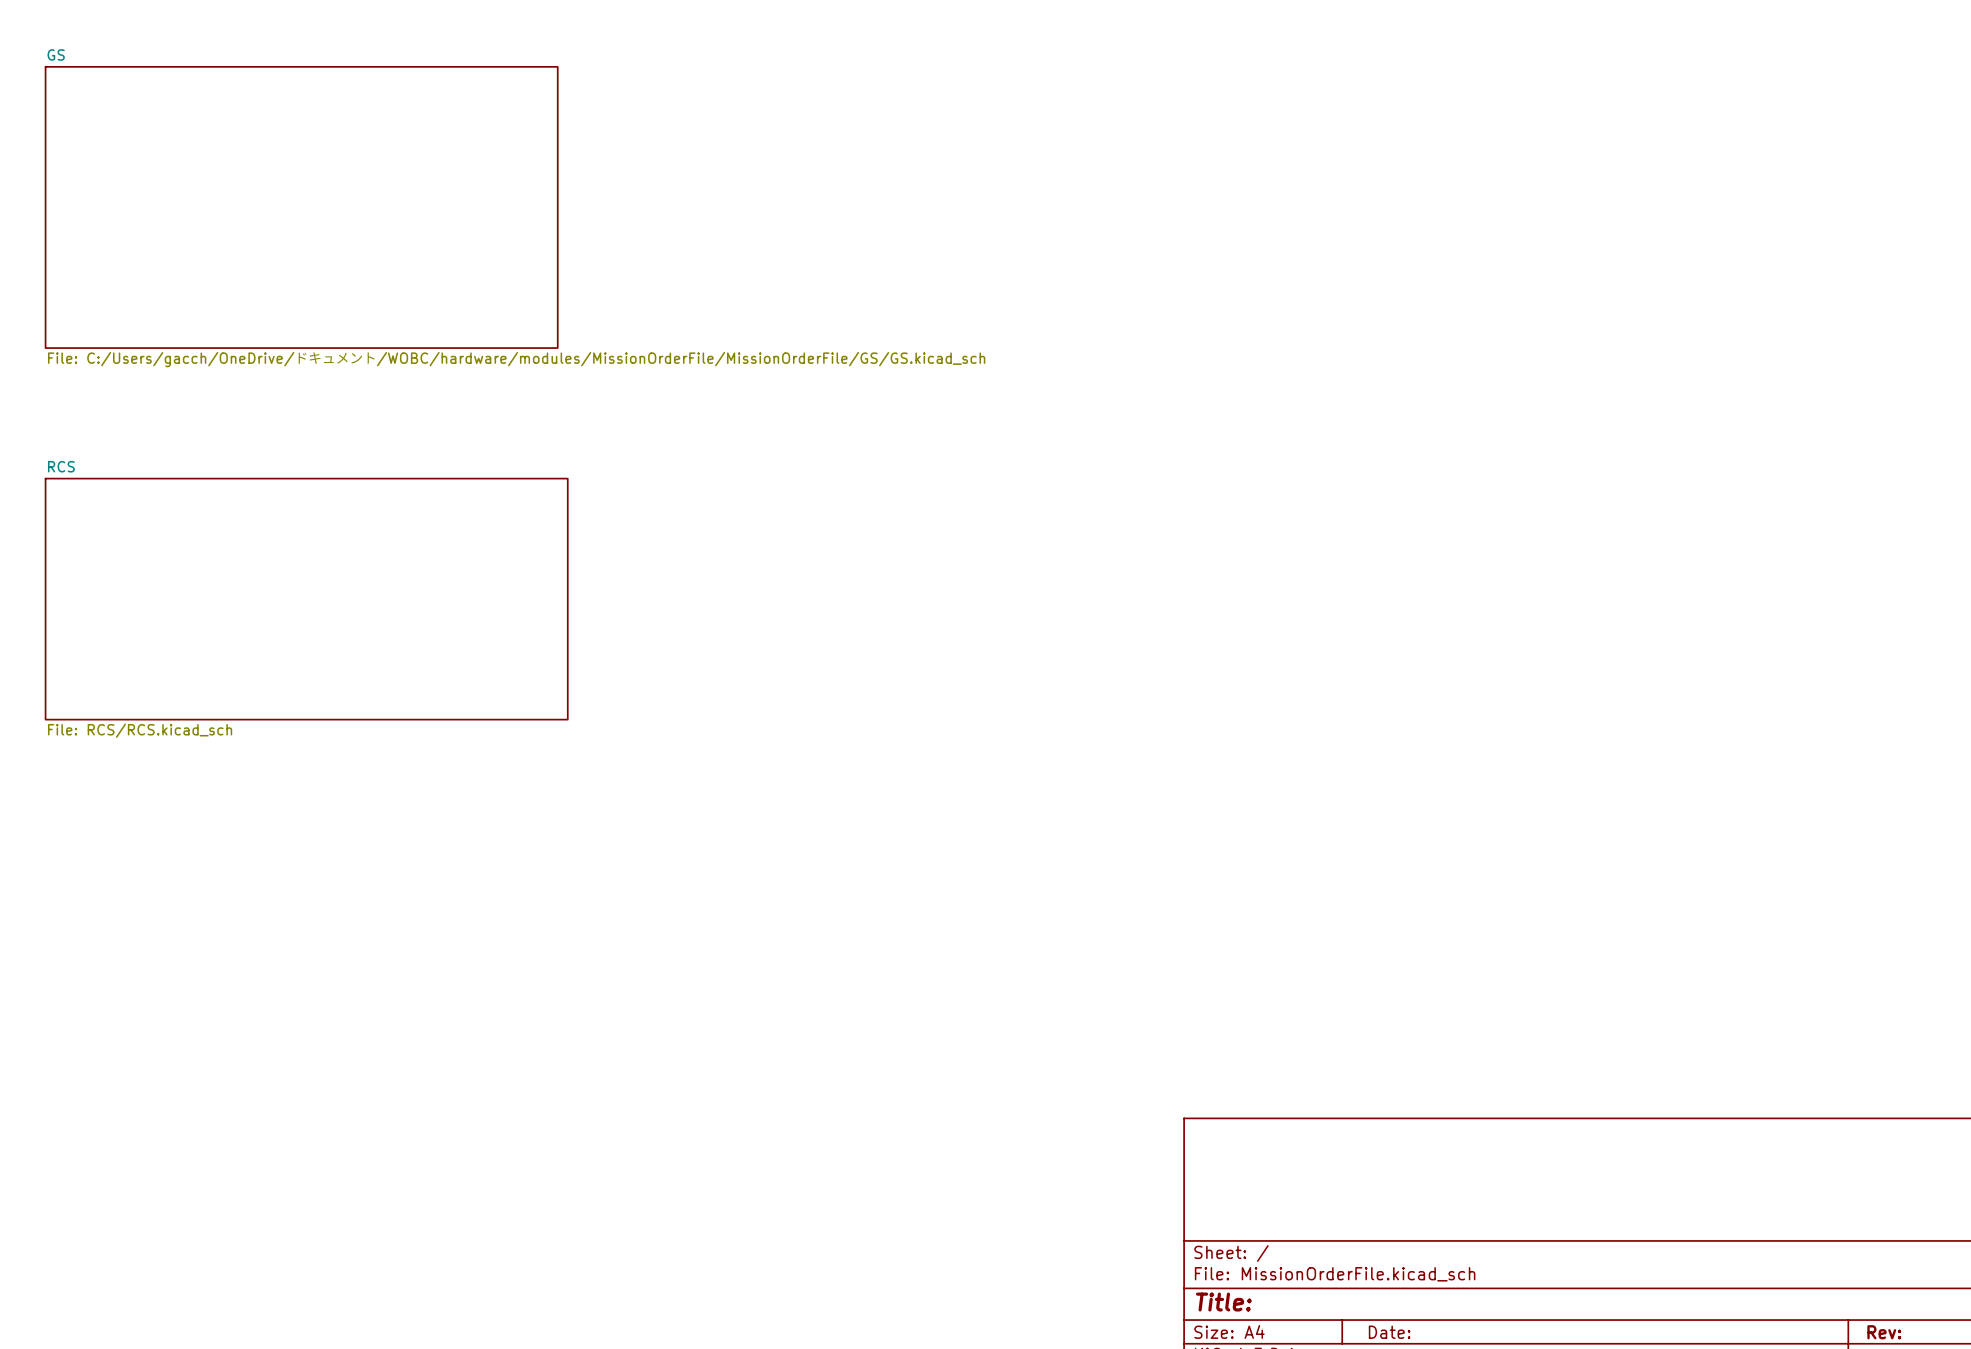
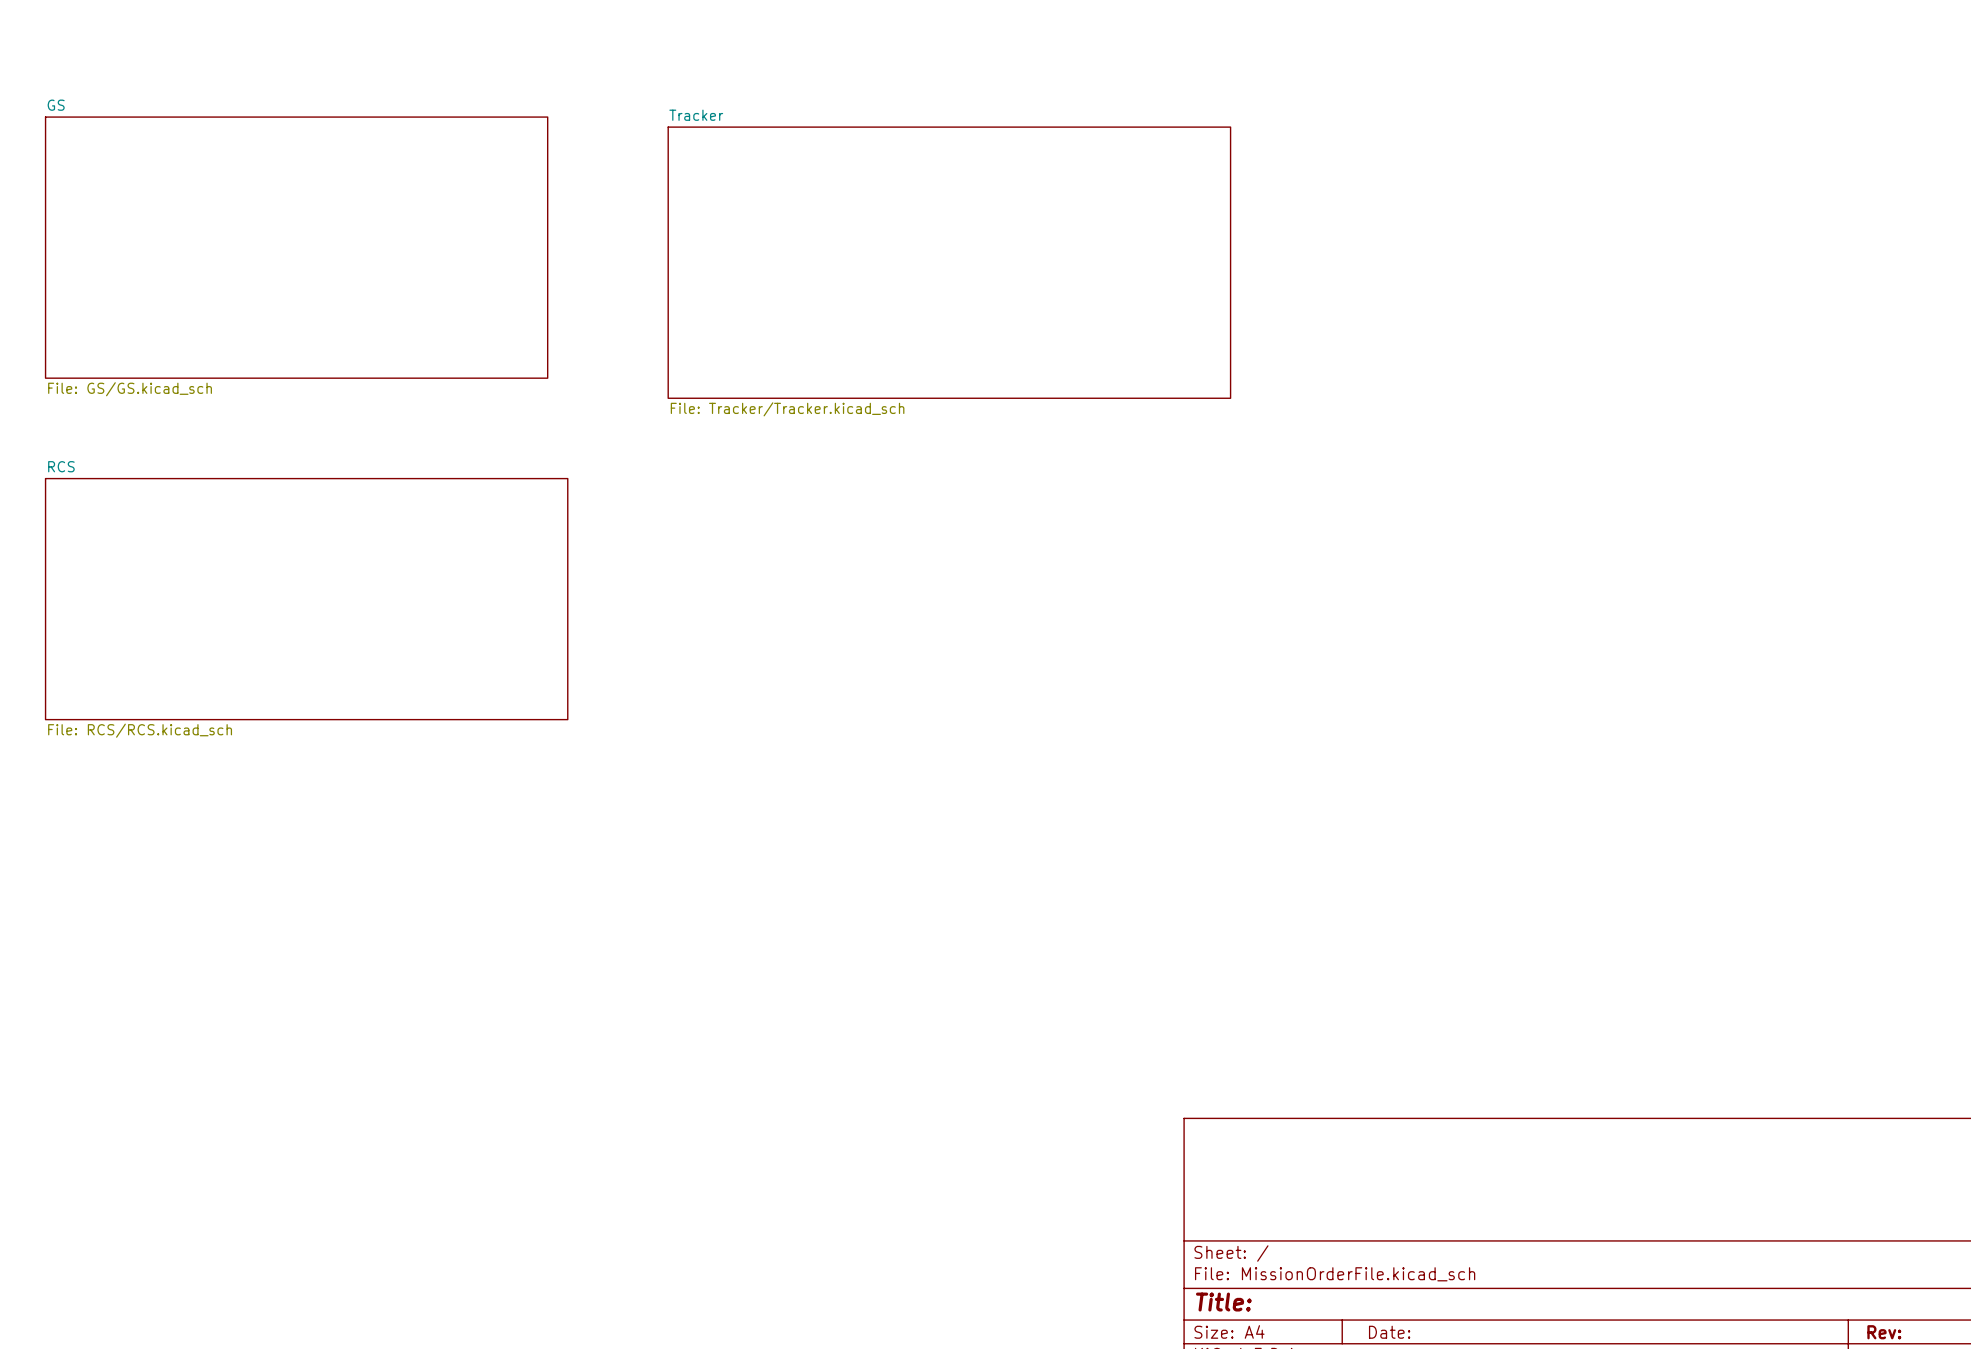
sheet GS: File: C:/Users/gacch/OneDrive/ドキュメント/WOBC/hardware/modules/MissionOrderFile/MissionOrderFile/GS/GS.kicad_sch (301, 207) -> none
sheet GS: none -> File: GS/GS.kicad_sch (296, 247)
sheet Tracker: none -> File: Tracker/Tracker.kicad_sch (949, 262)

